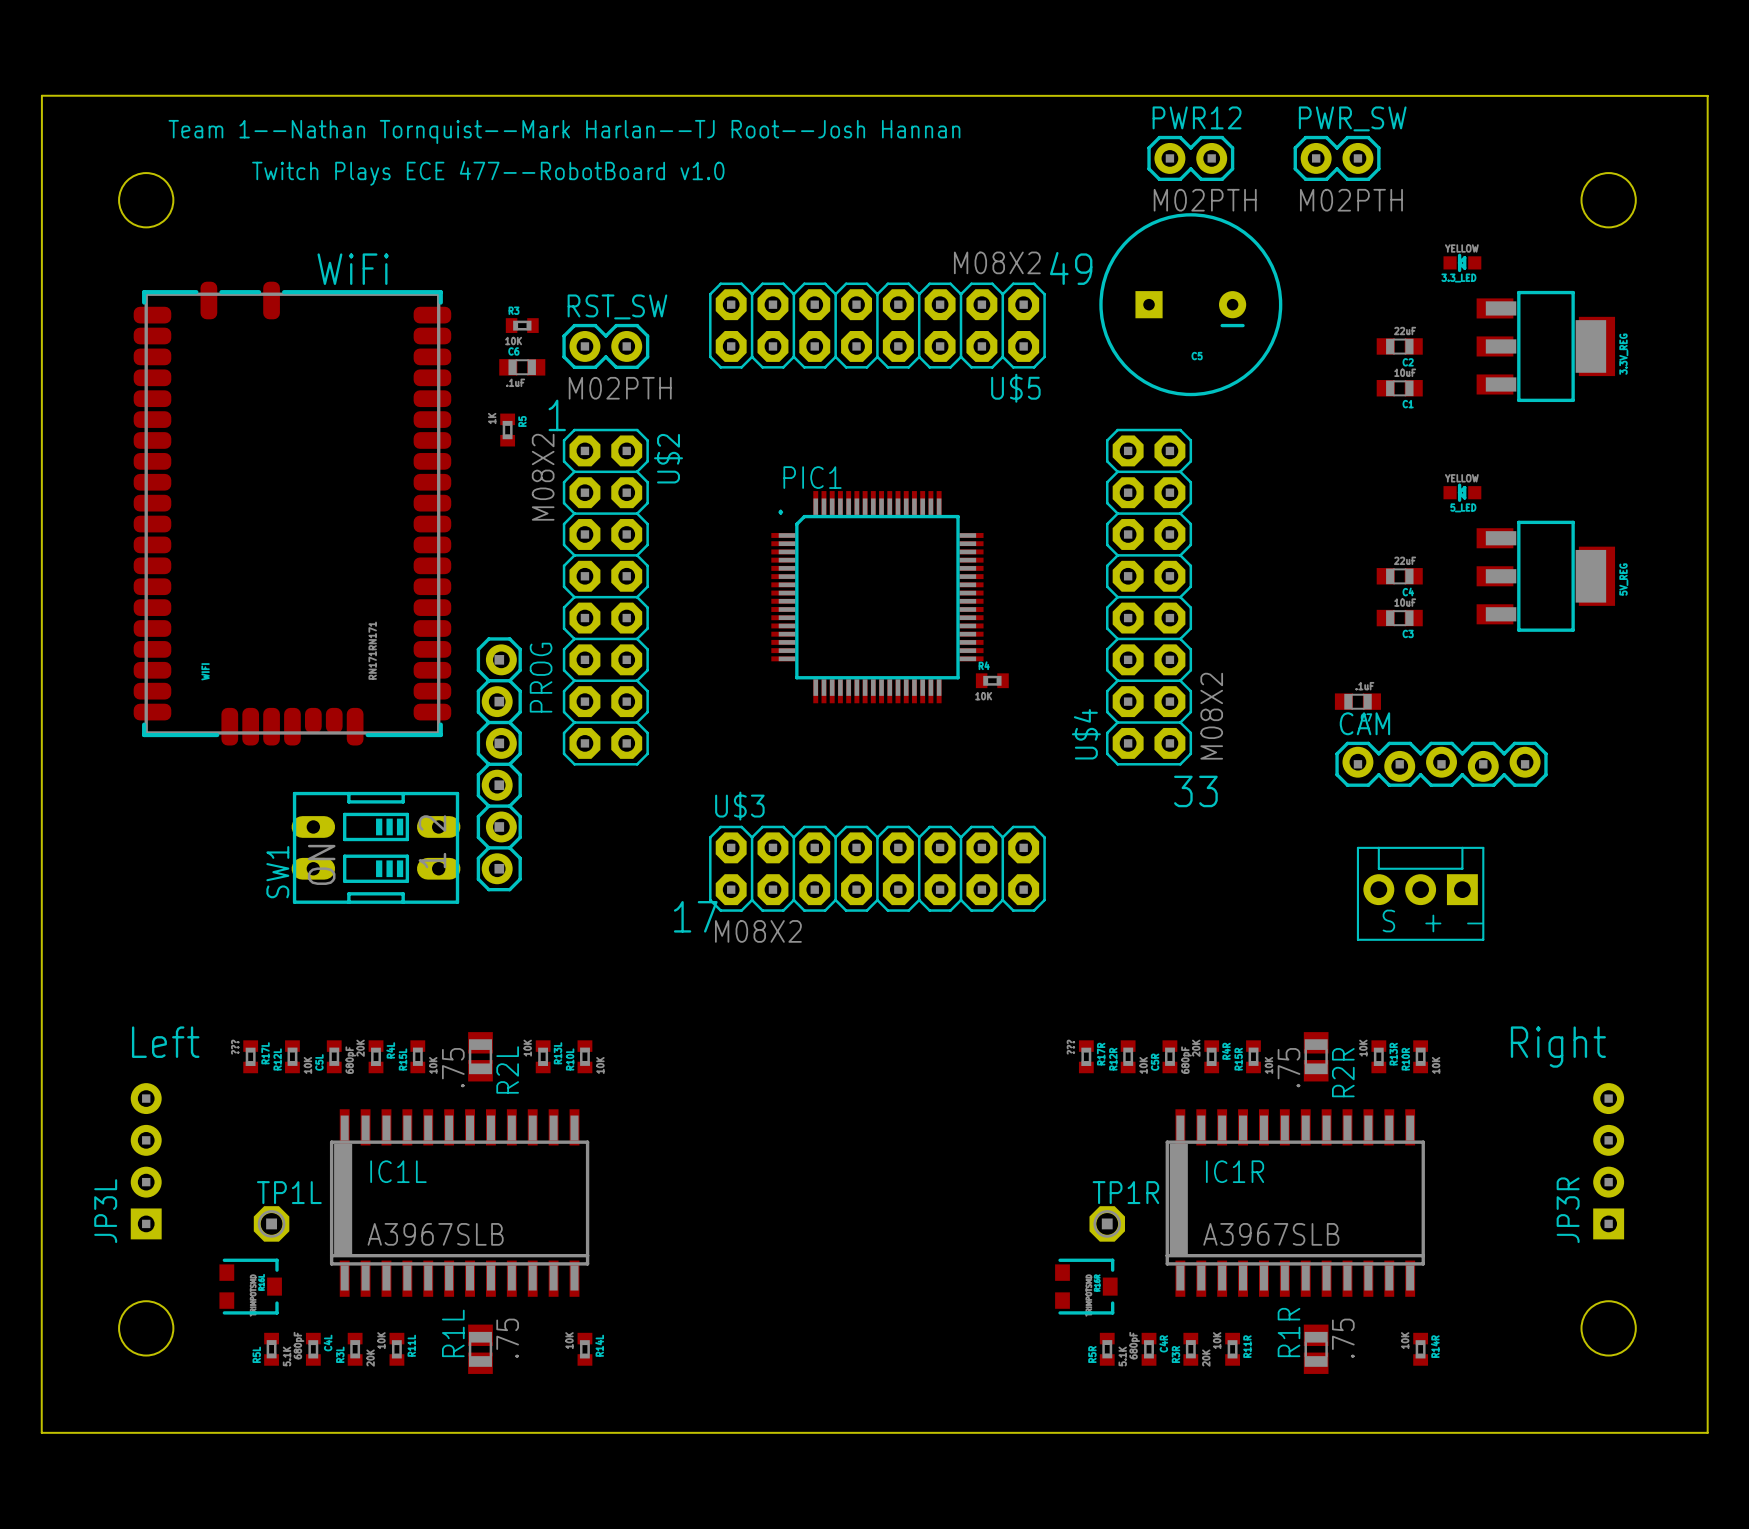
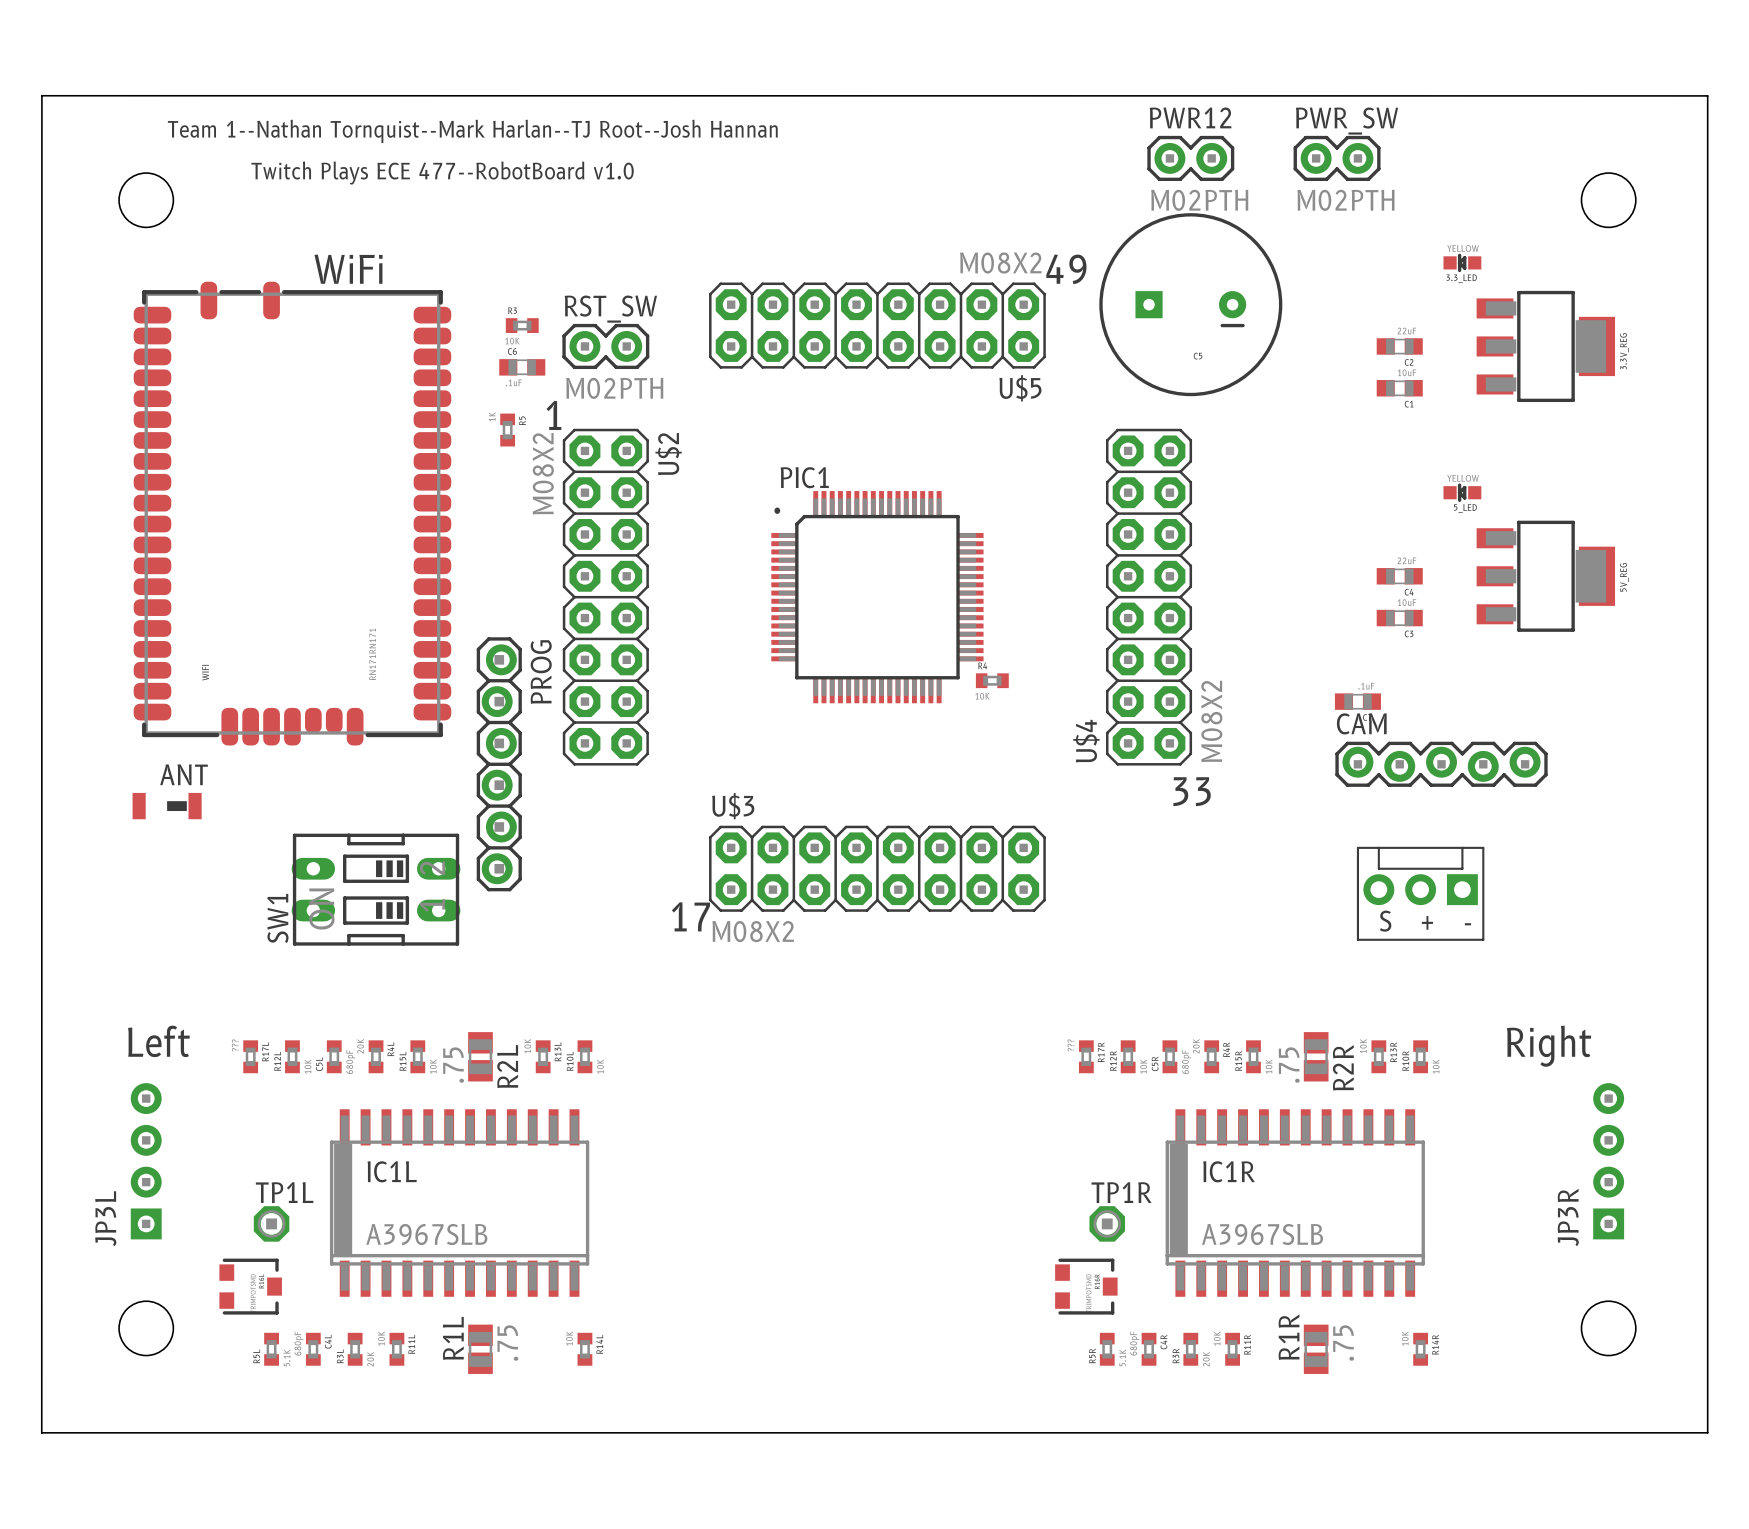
ANT: none -> (167, 806)
SW1 position: (376, 847) -> (376, 889)

